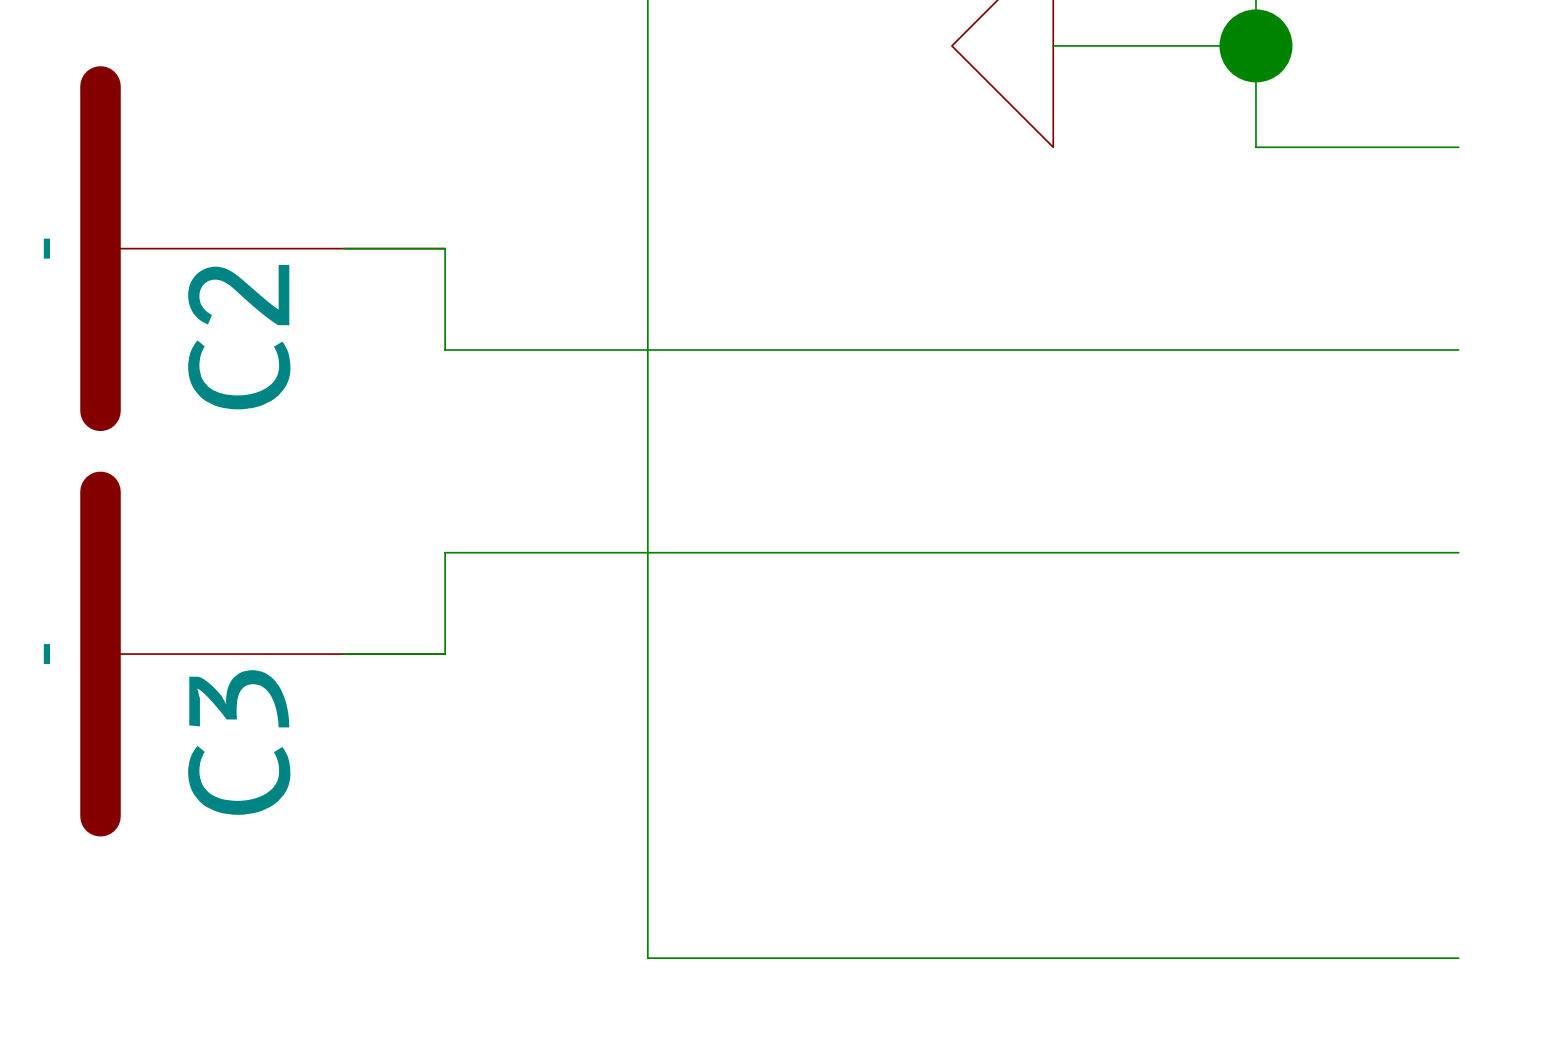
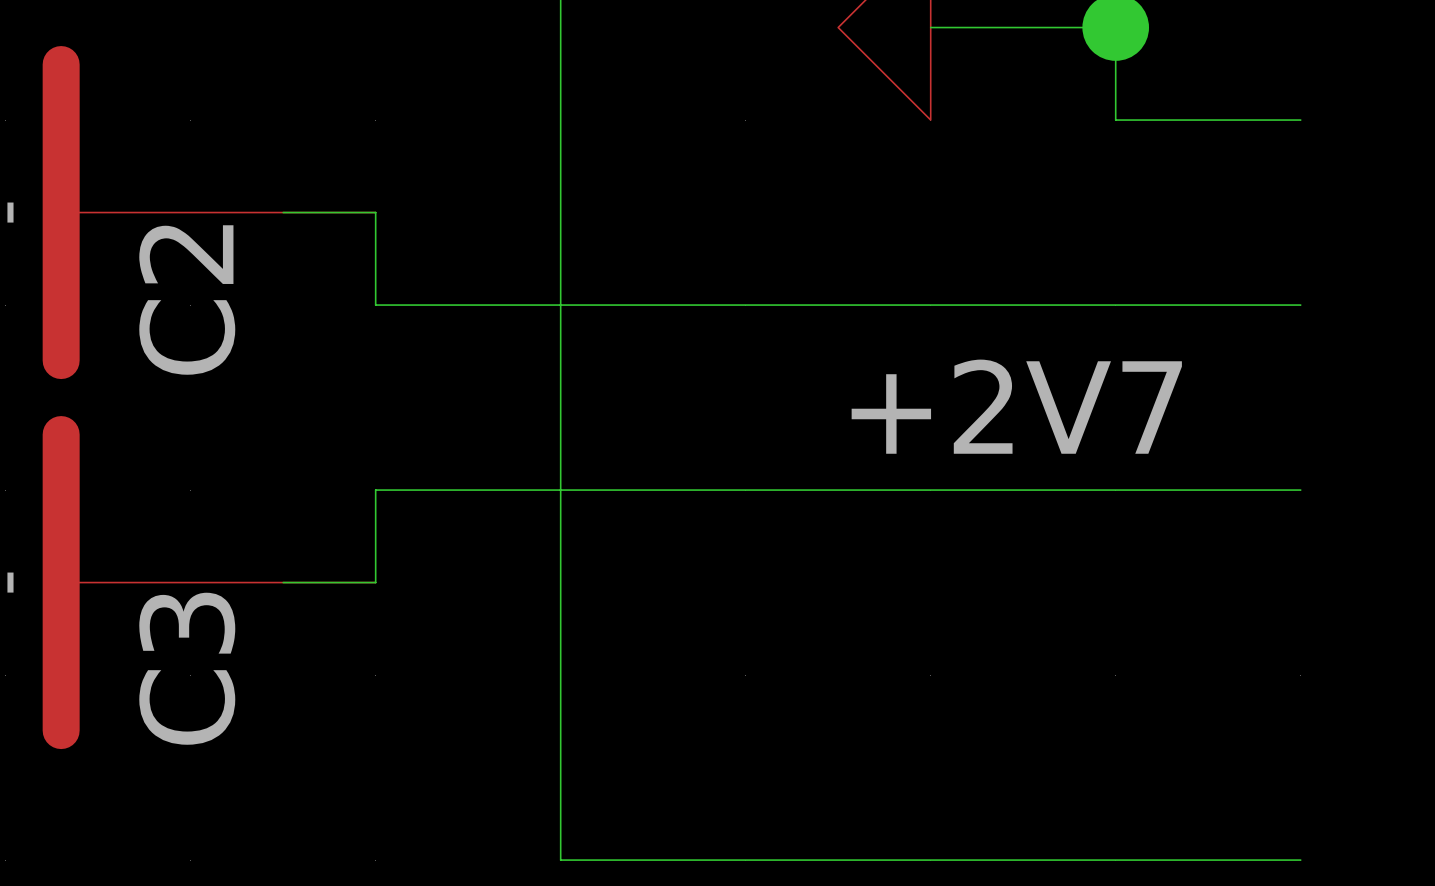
label: none -> +2V7 (1016, 406)

